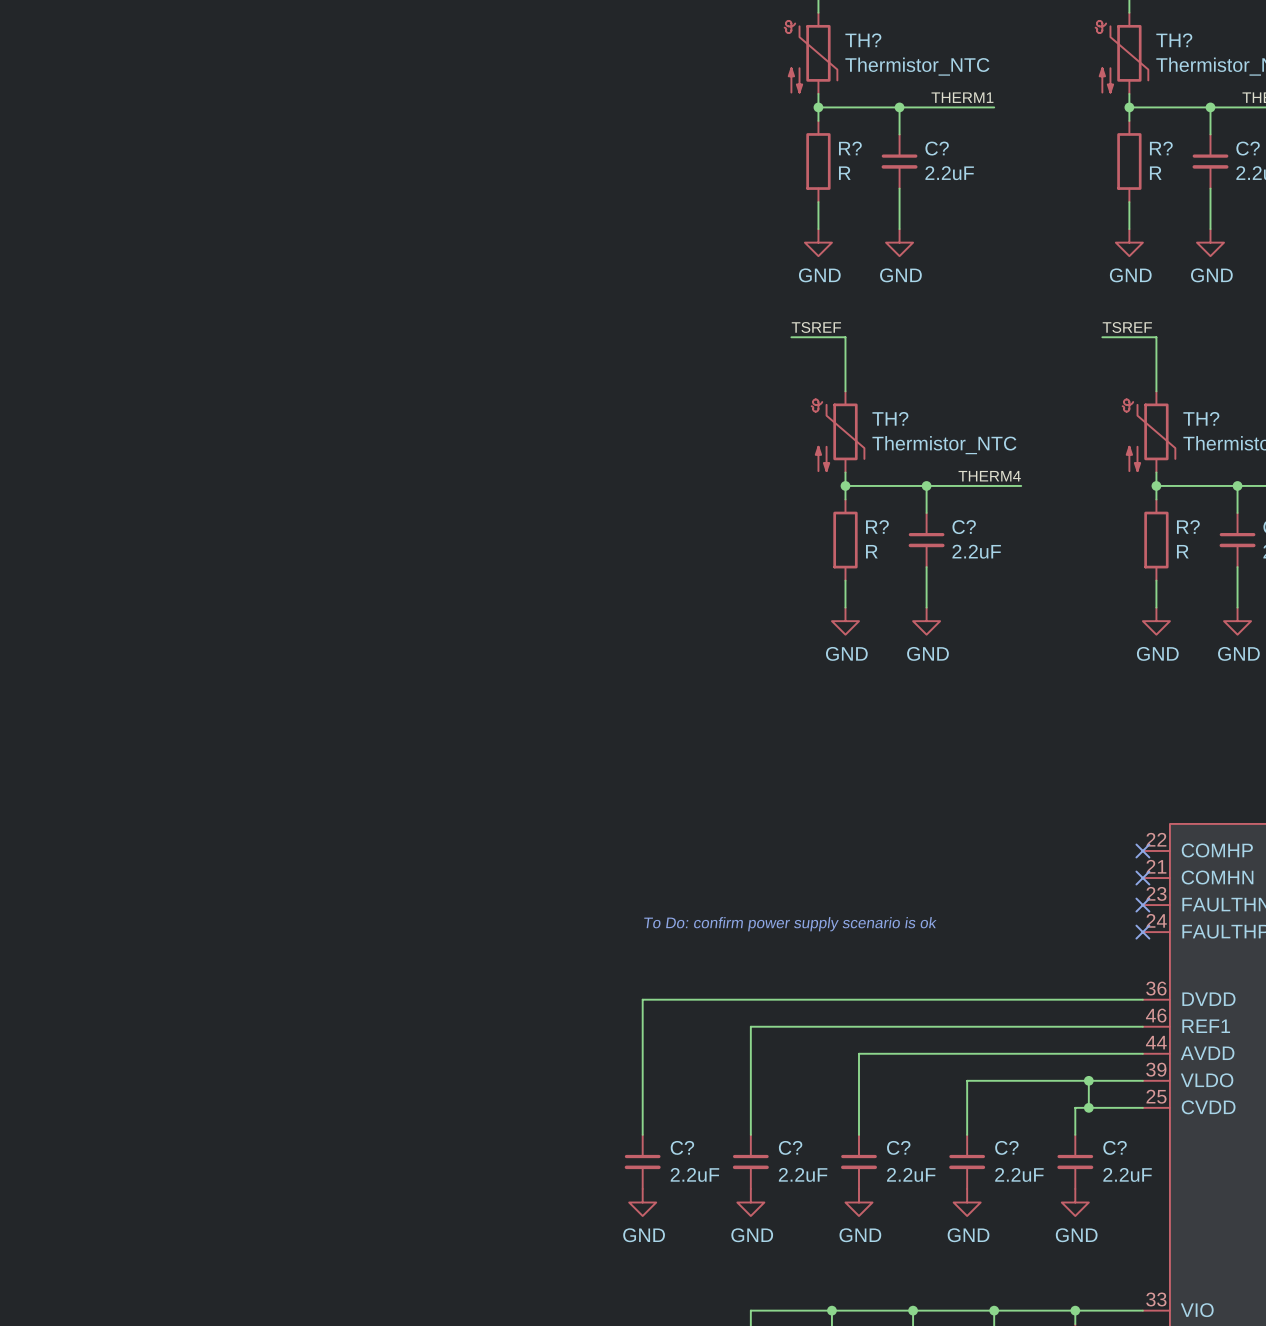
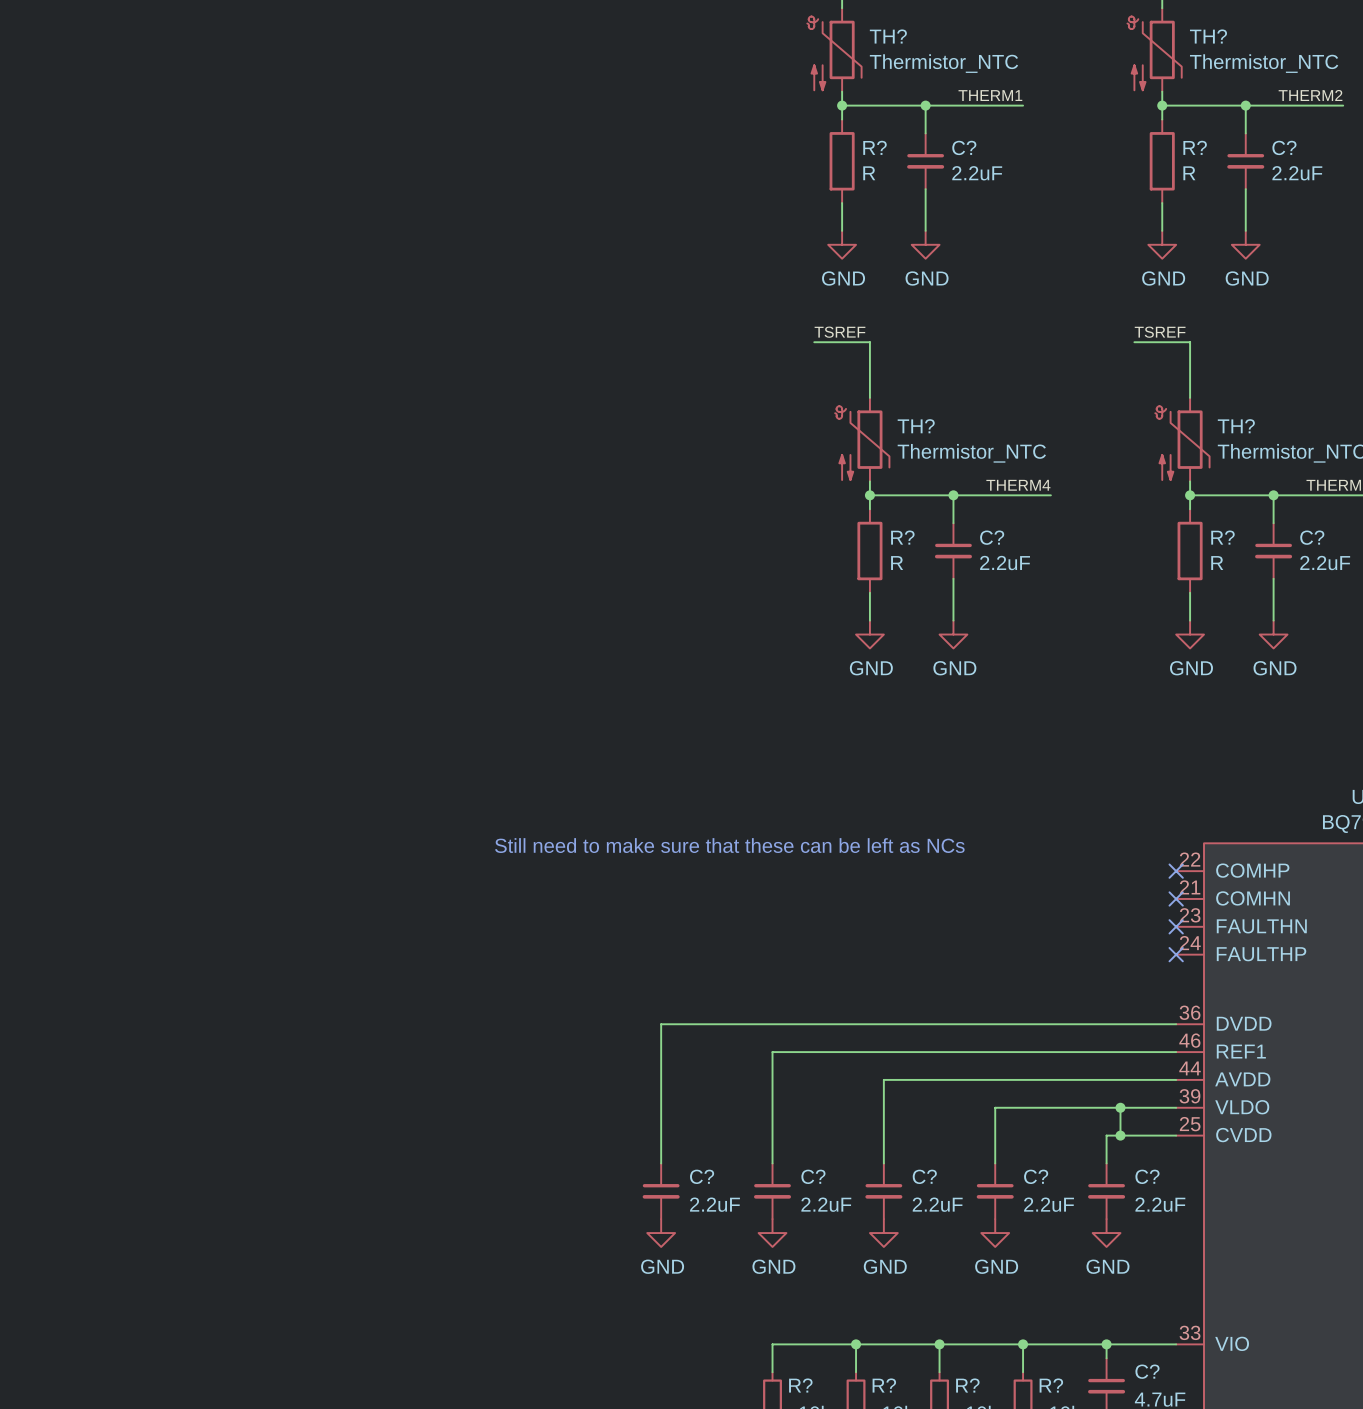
text: none -> Still need to make sure that these can be left as NCs (729, 845)
text: To Do: confirm power supply scenario is ok (790, 924) -> none

